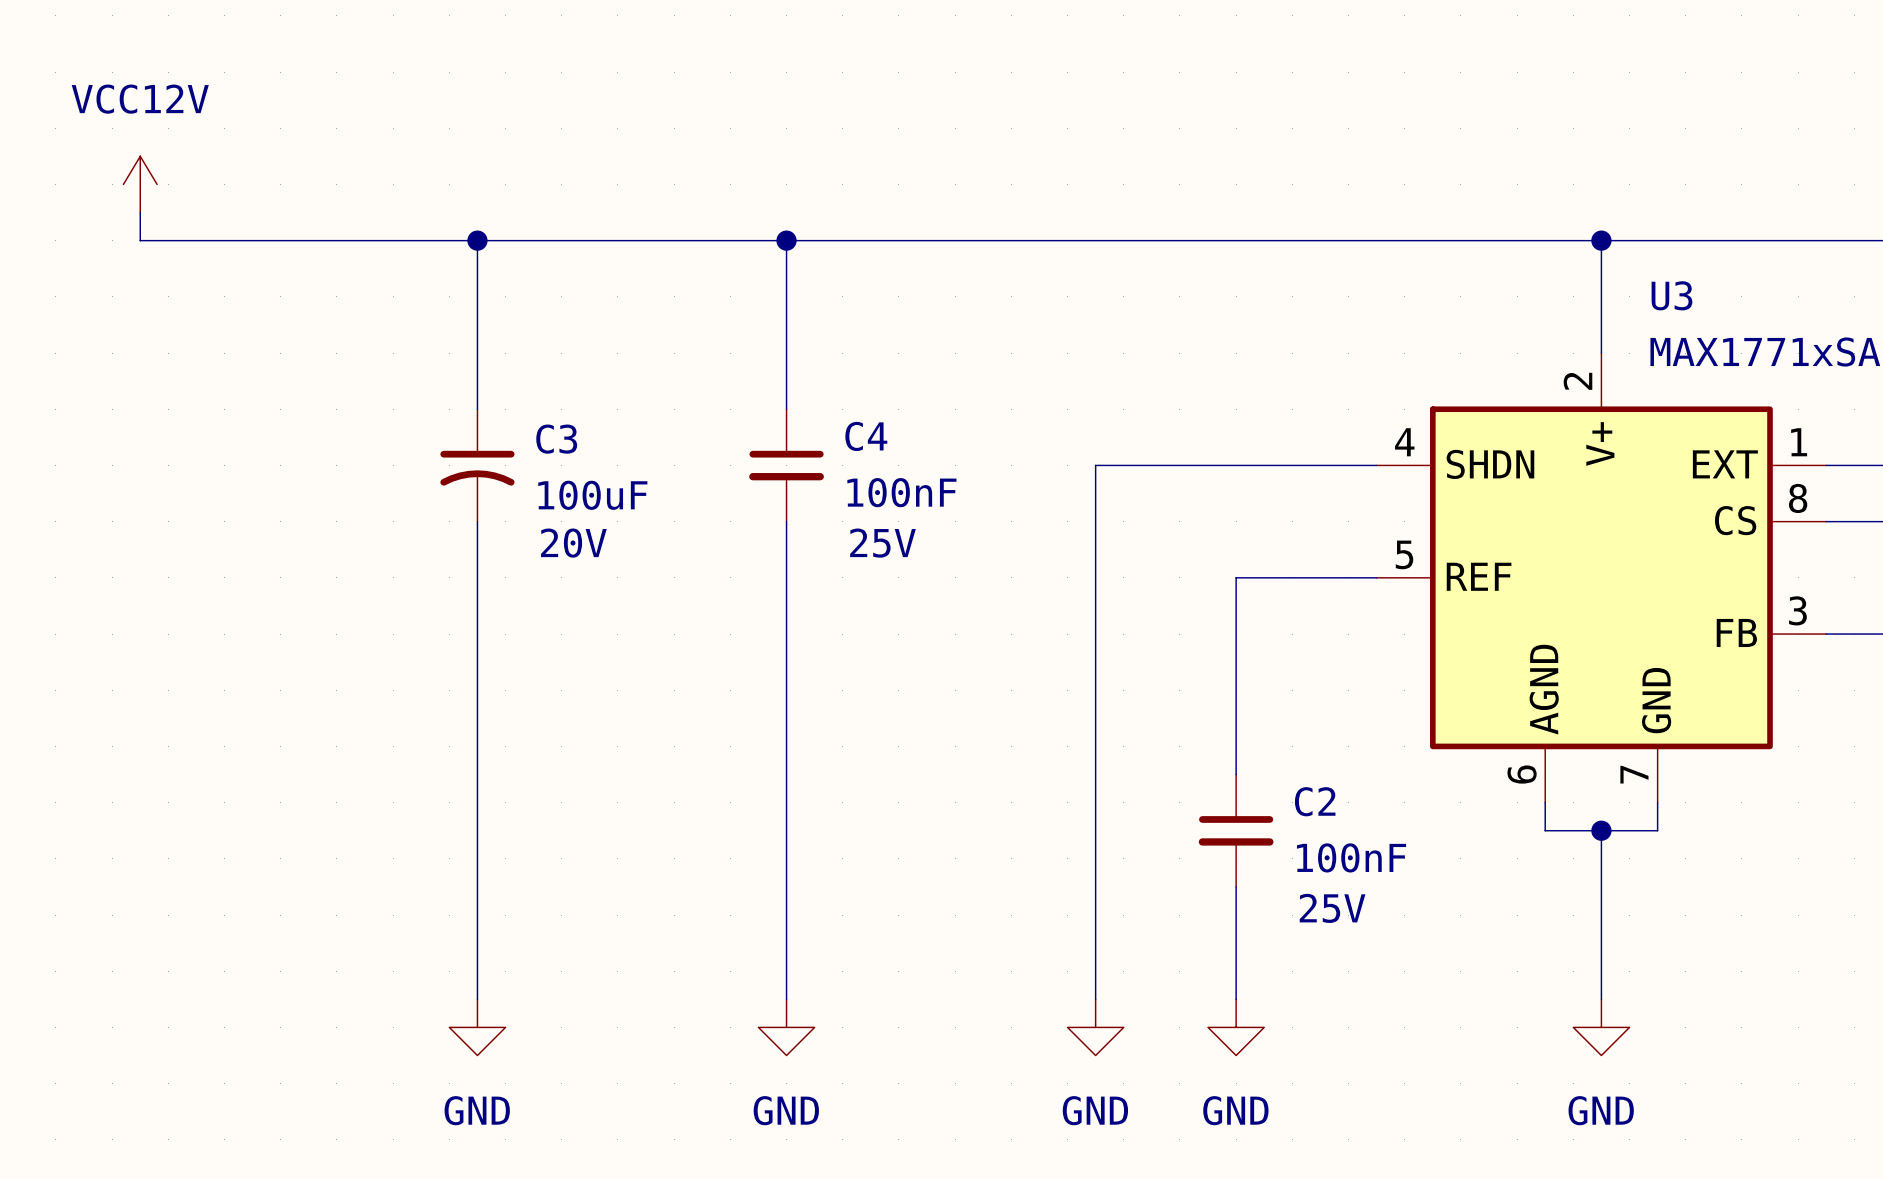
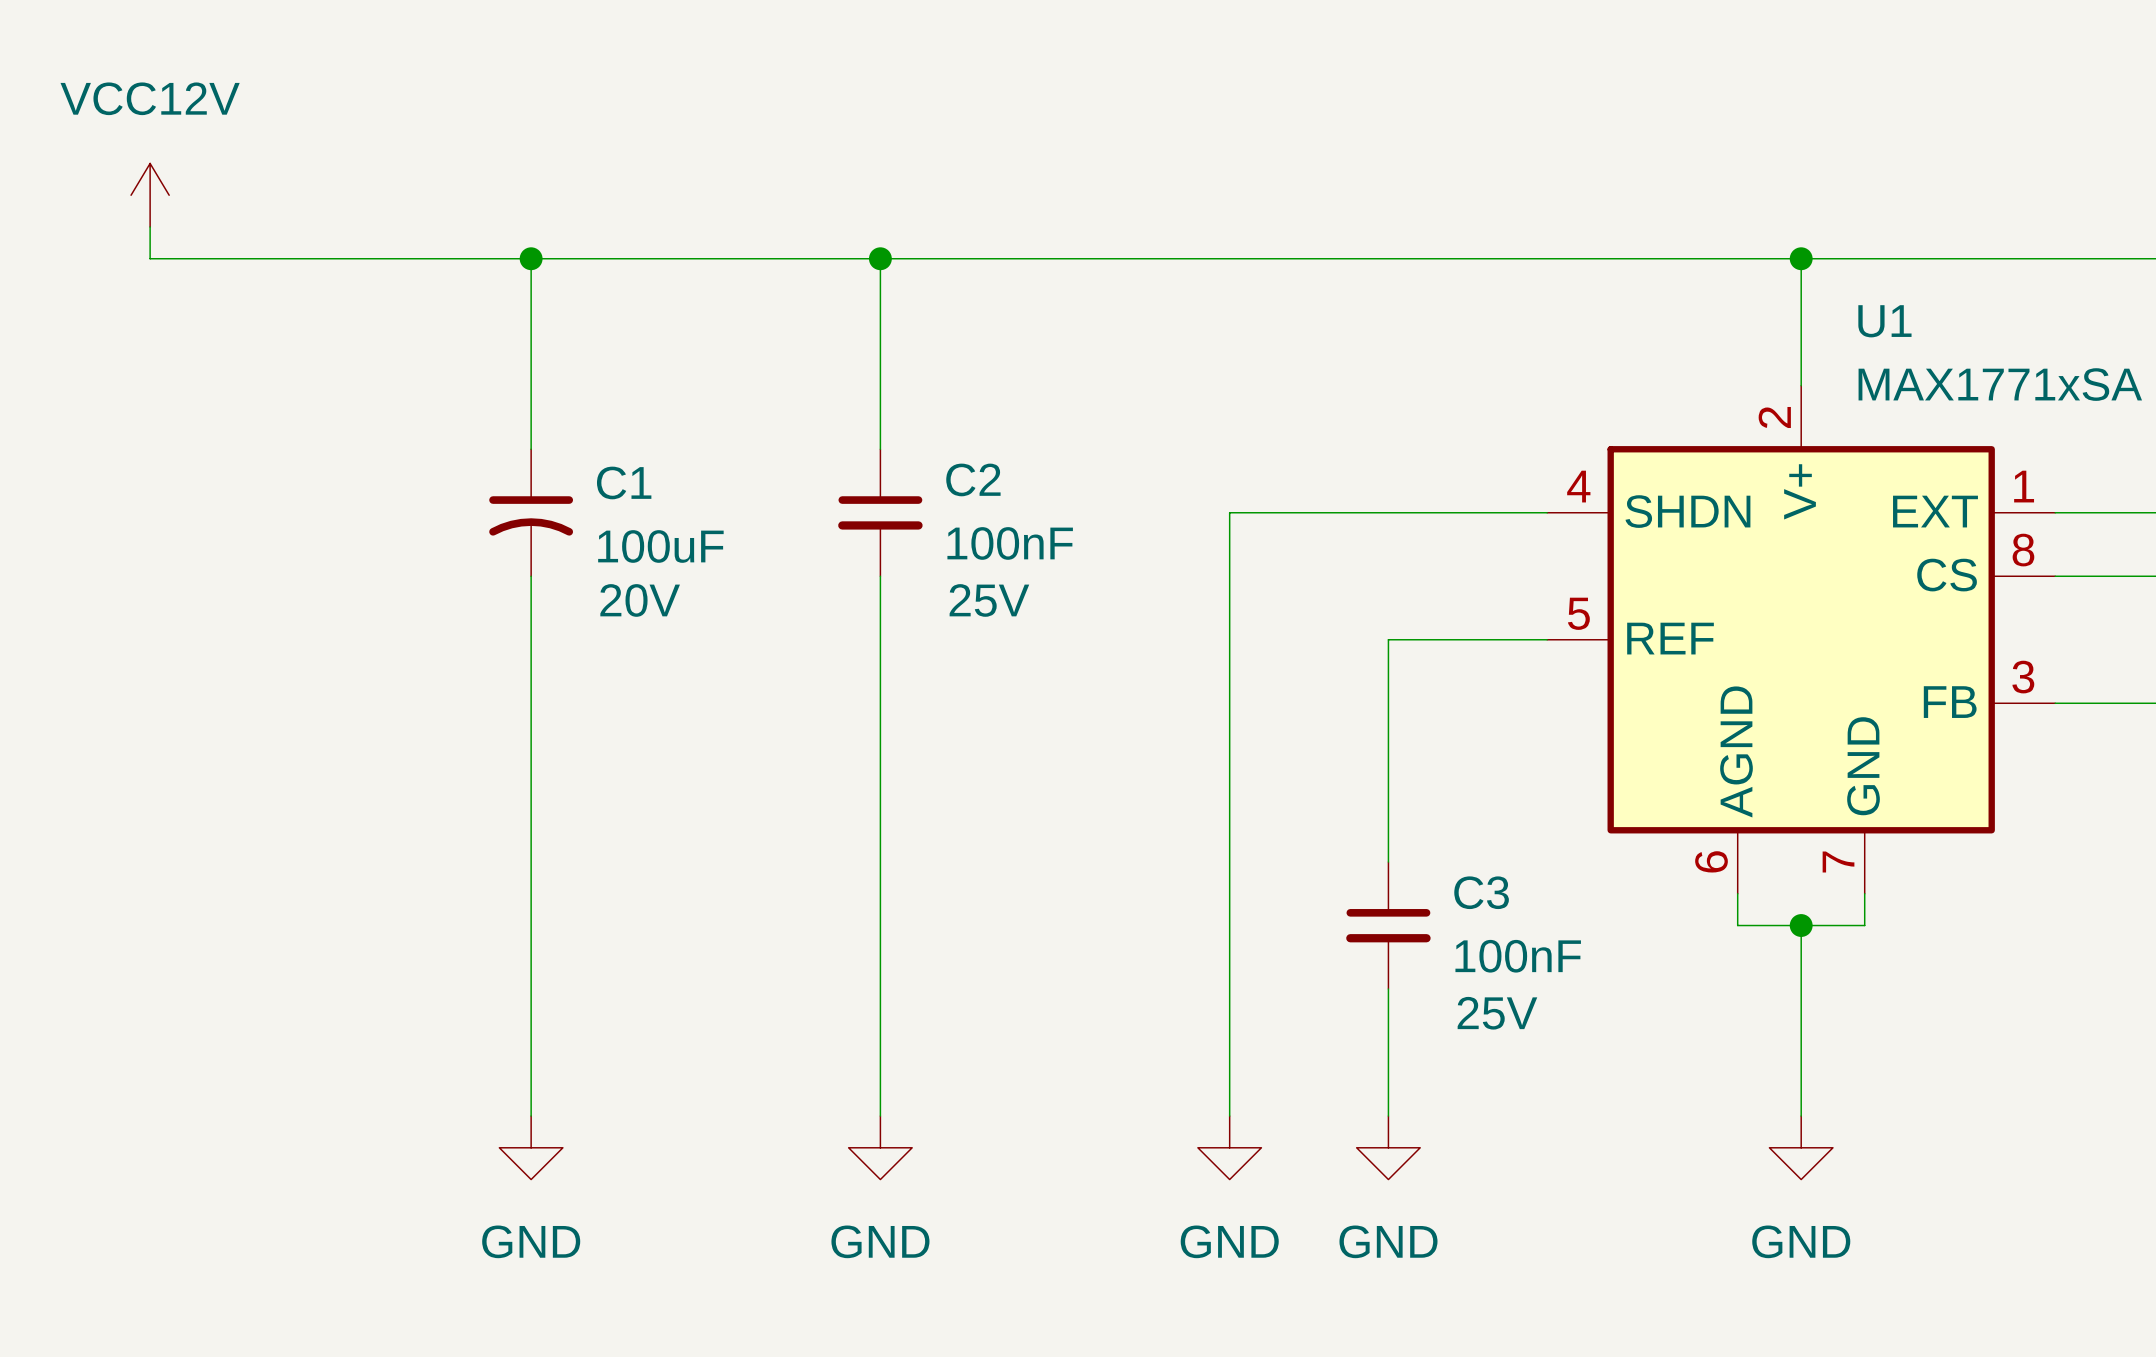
U3 name: U3 (1671, 295) -> U1 (1884, 321)
C4 name: C4 (866, 436) -> C2 (973, 479)
C3 name: C3 (556, 439) -> C1 (624, 482)
C2 name: C2 (1315, 801) -> C3 (1481, 892)

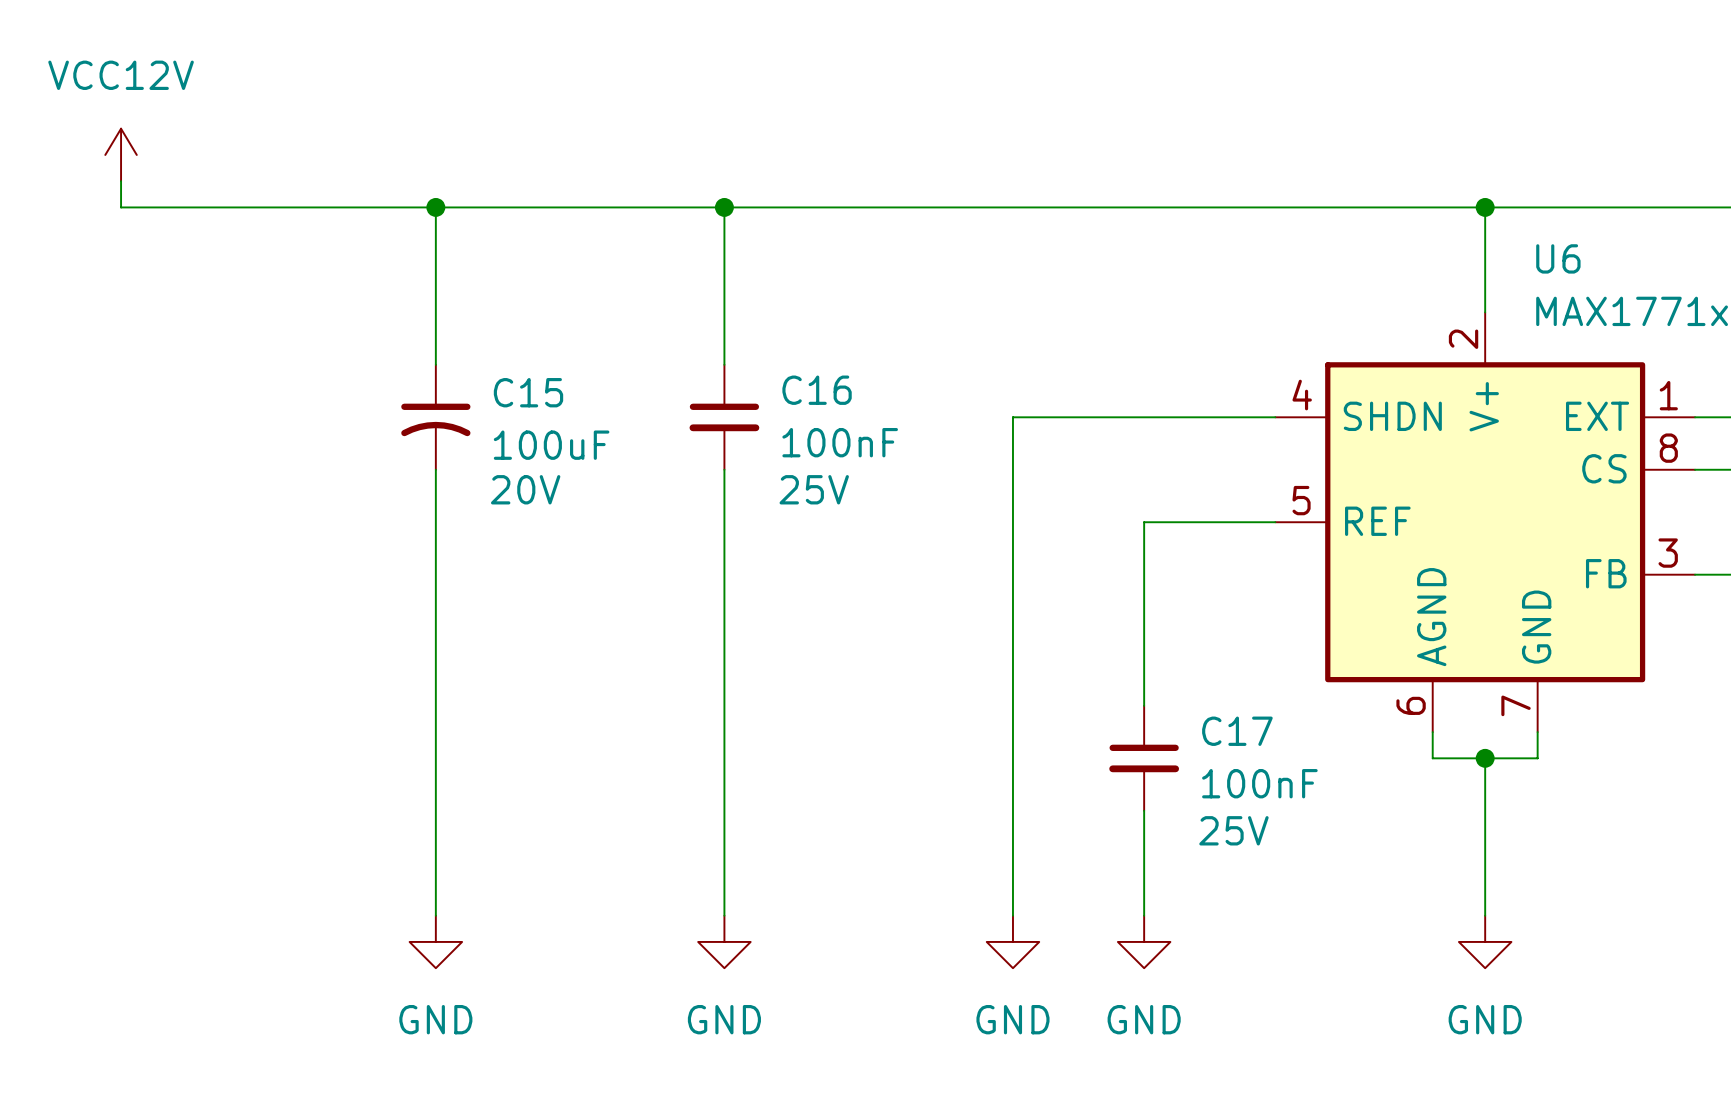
U1 name: U1 (1884, 321) -> U6 (1558, 258)
C2 name: C2 (973, 479) -> C16 (817, 390)
C1 name: C1 (624, 482) -> C15 (528, 392)
C3 name: C3 (1481, 892) -> C17 (1237, 731)

